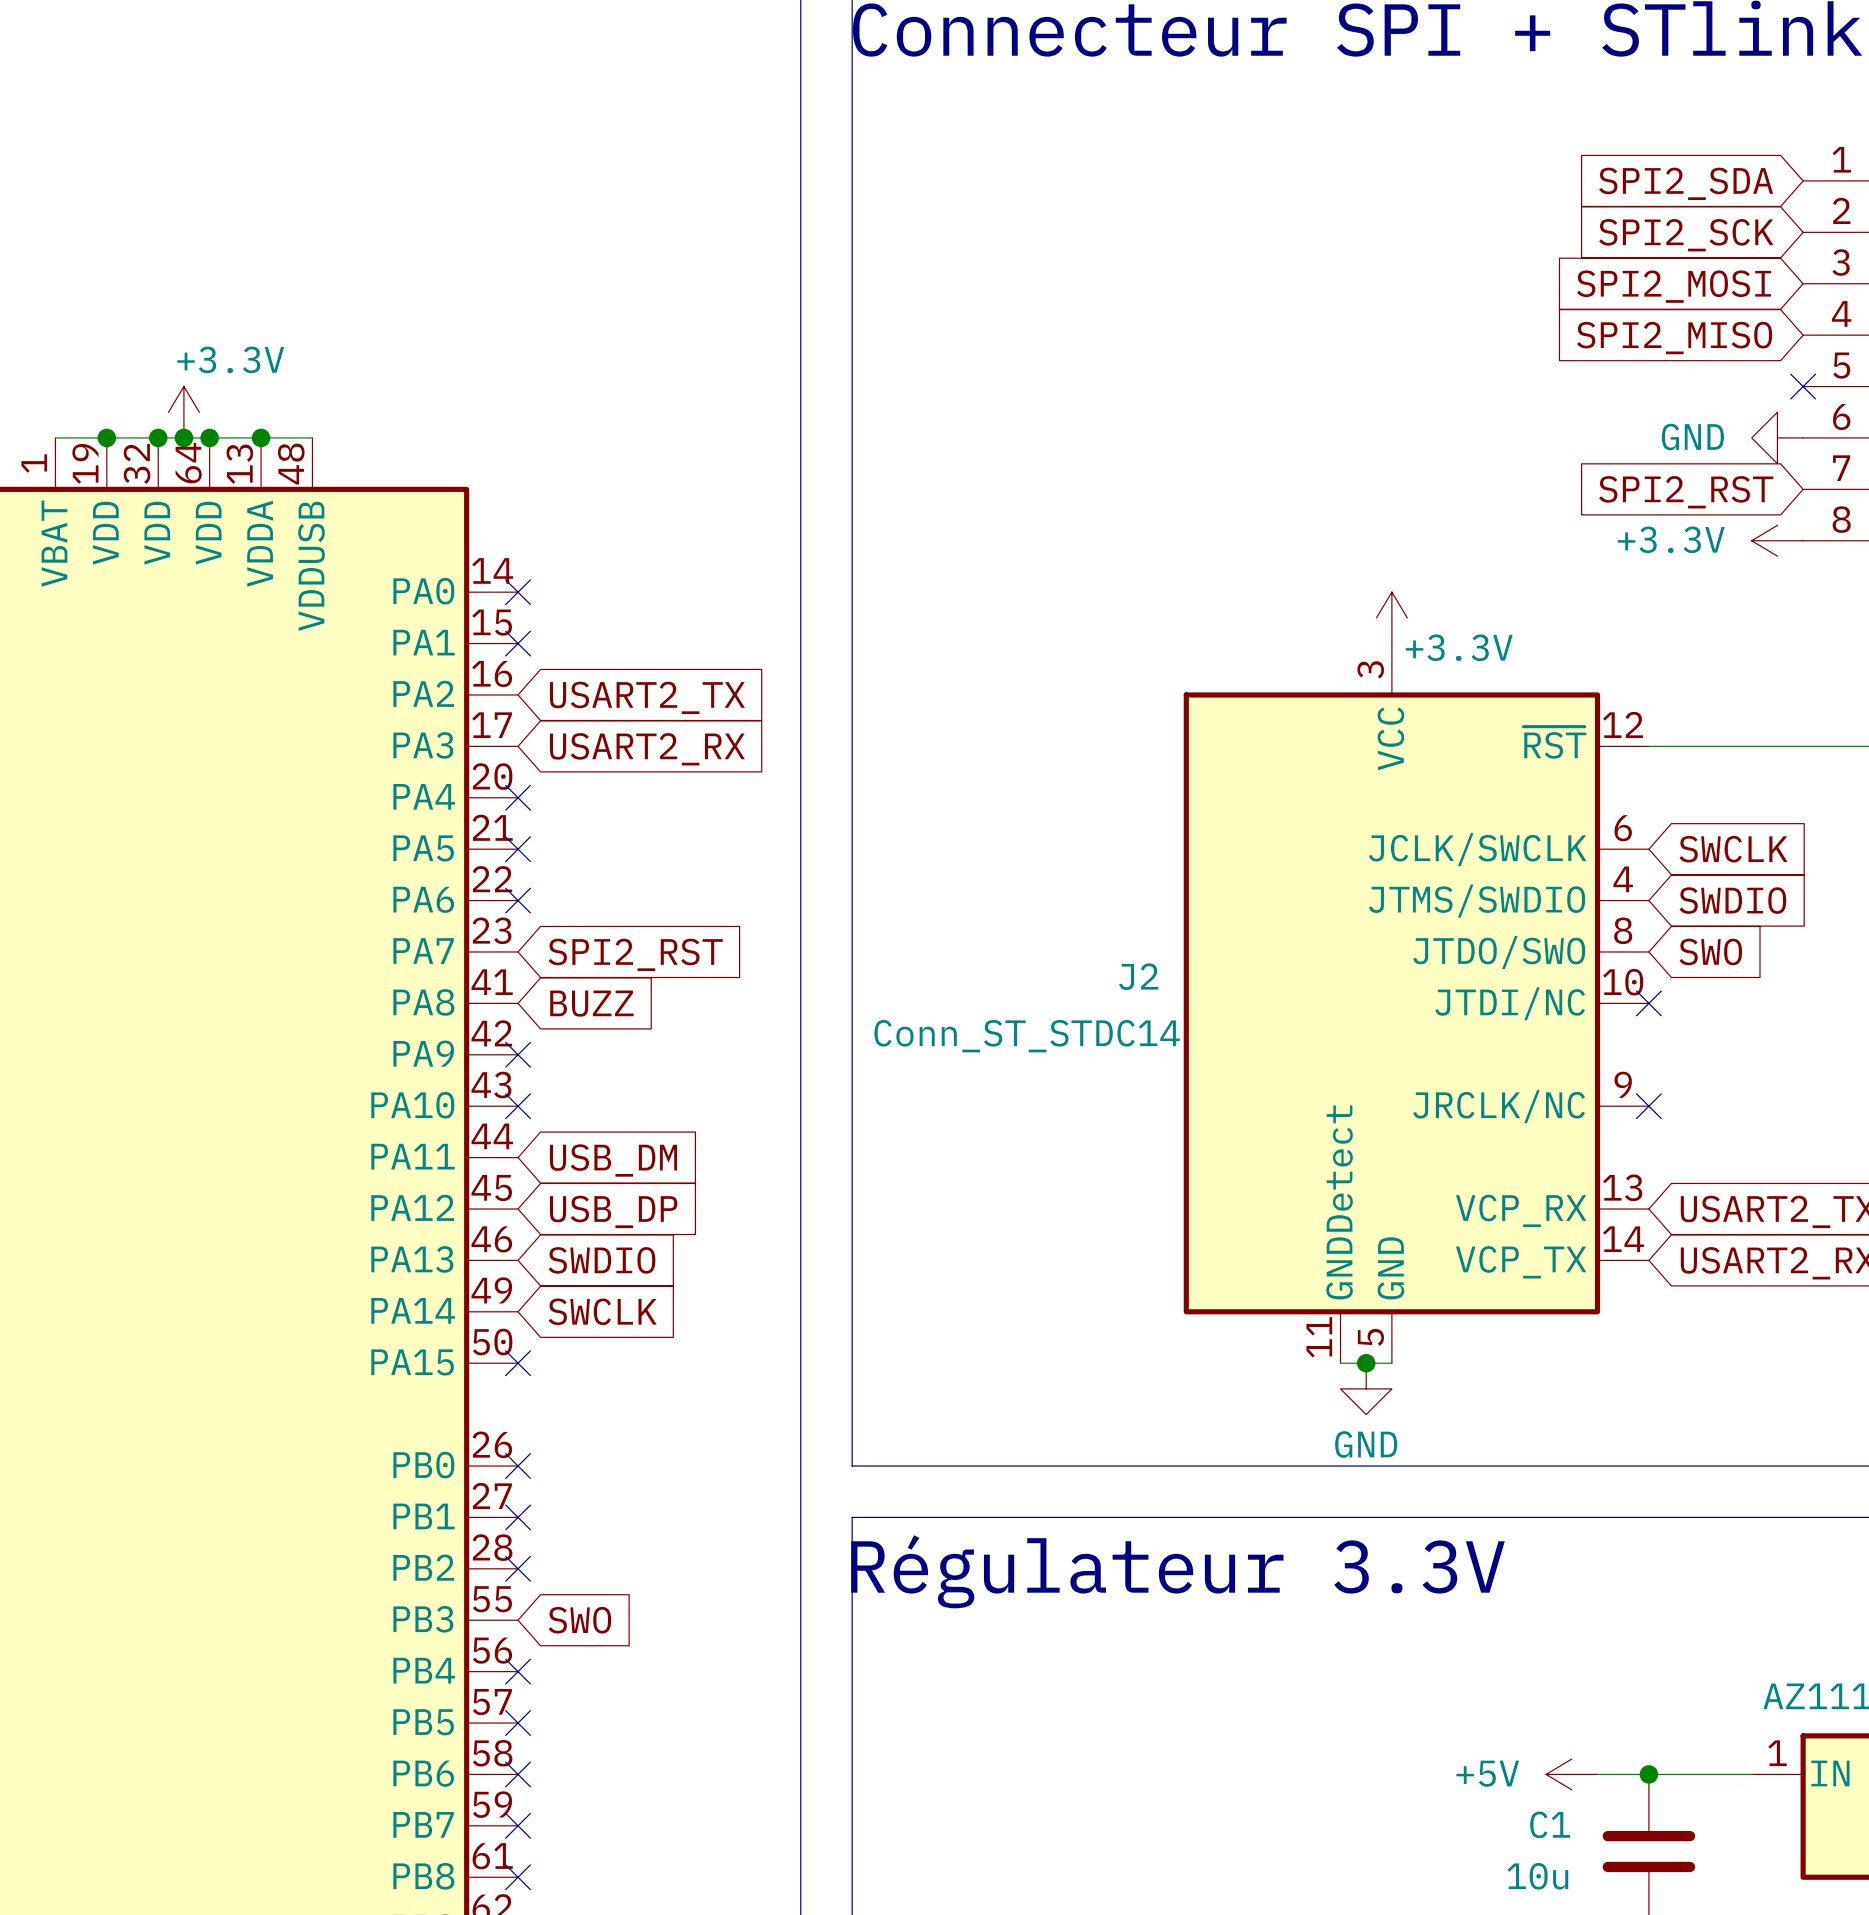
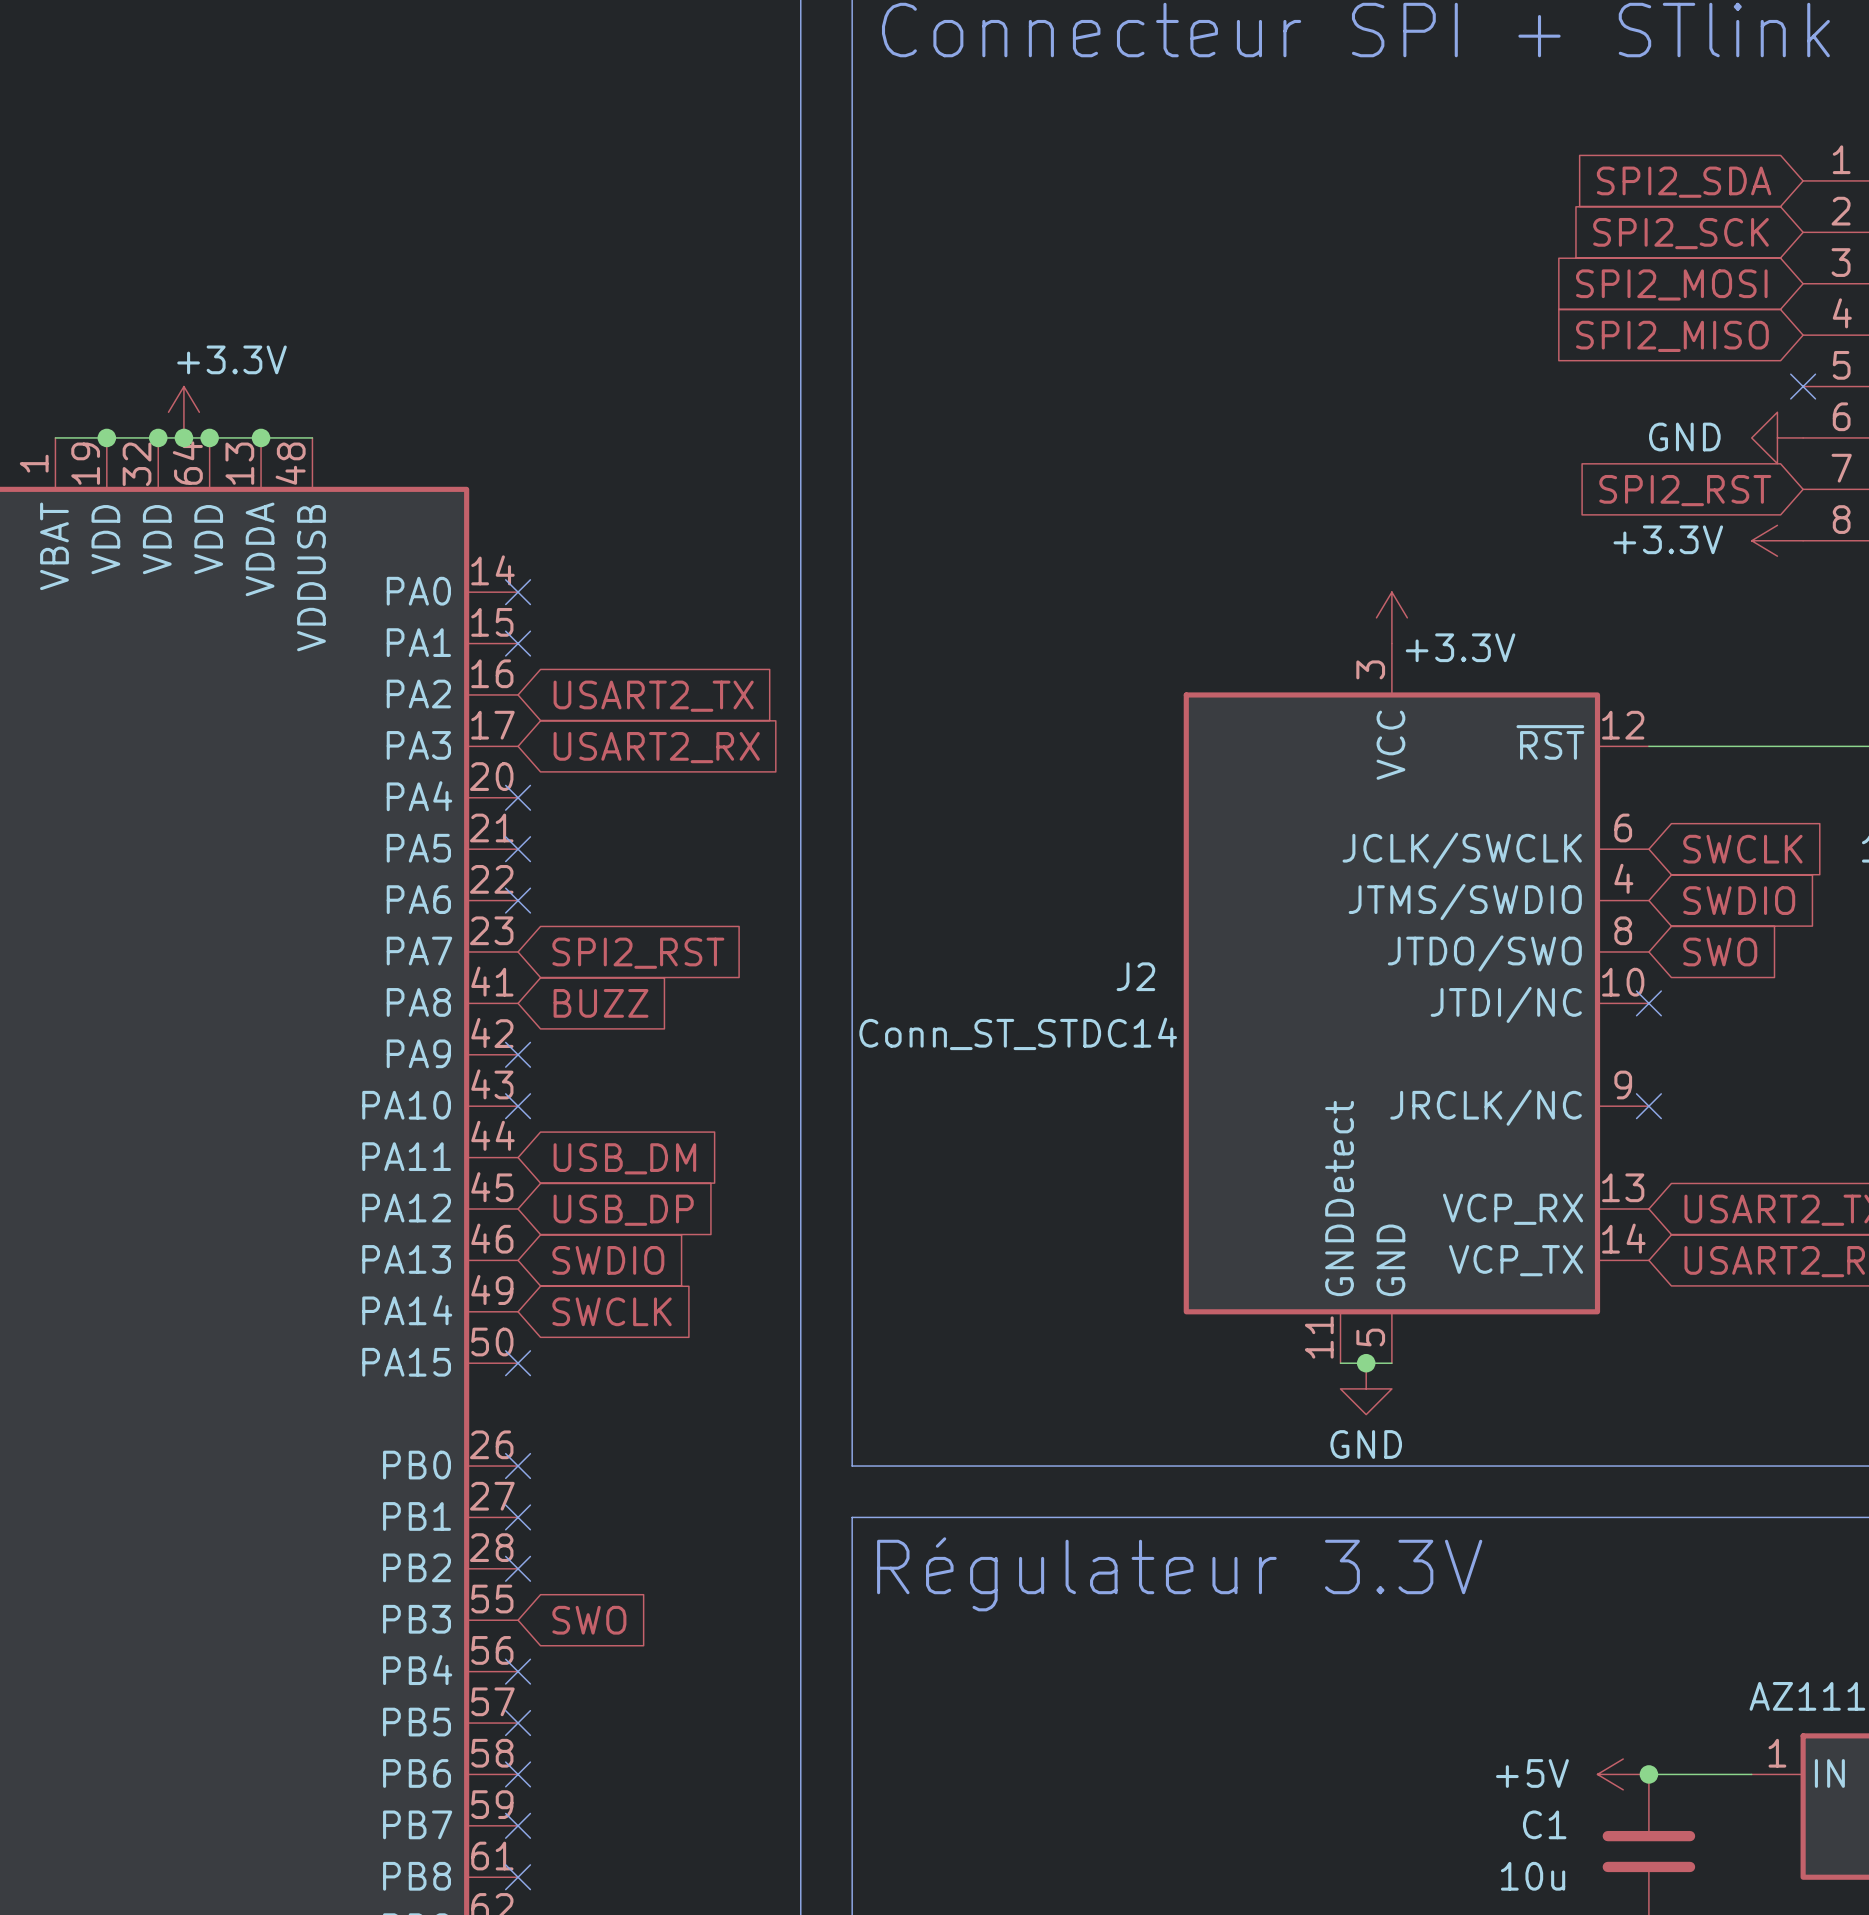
power symbol position: +5V (1571, 1774) -> +5V (1623, 1774)

